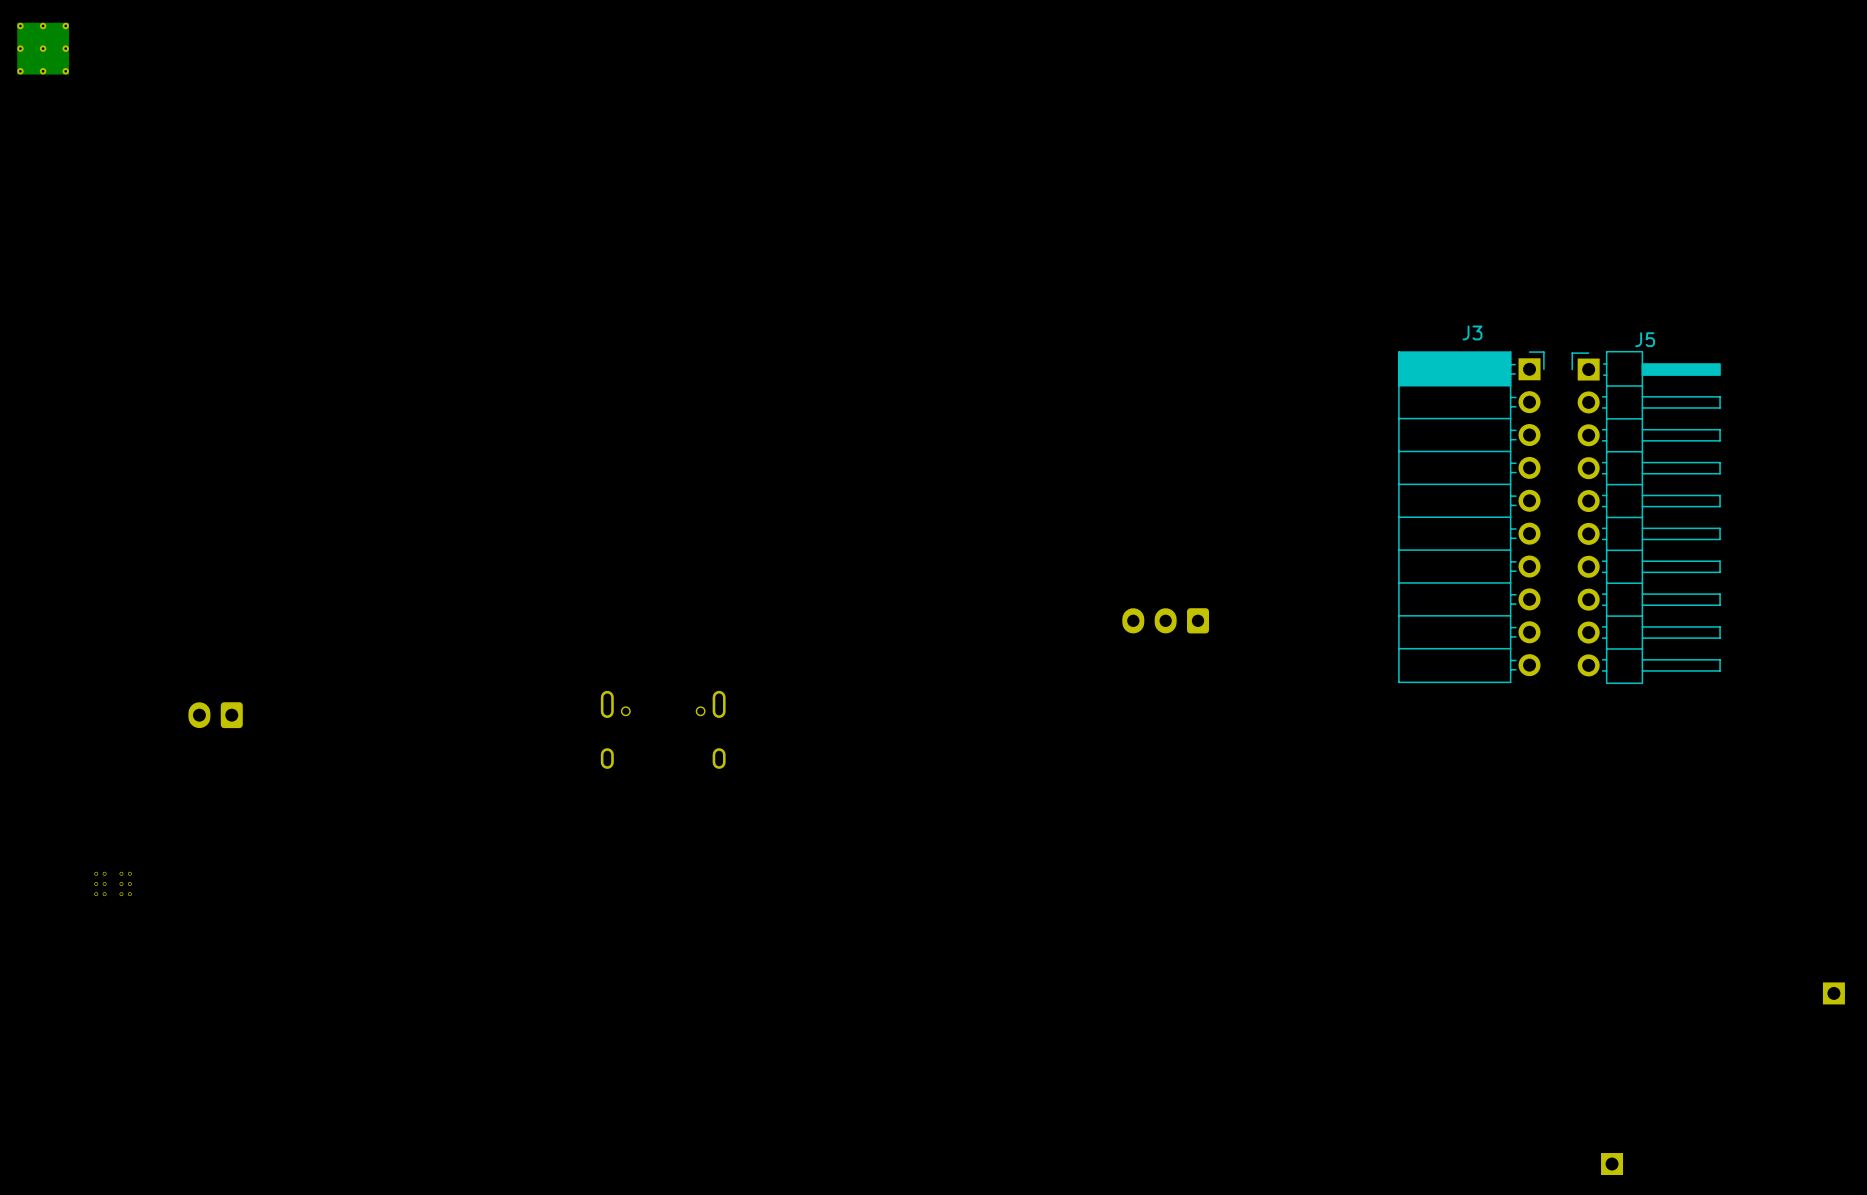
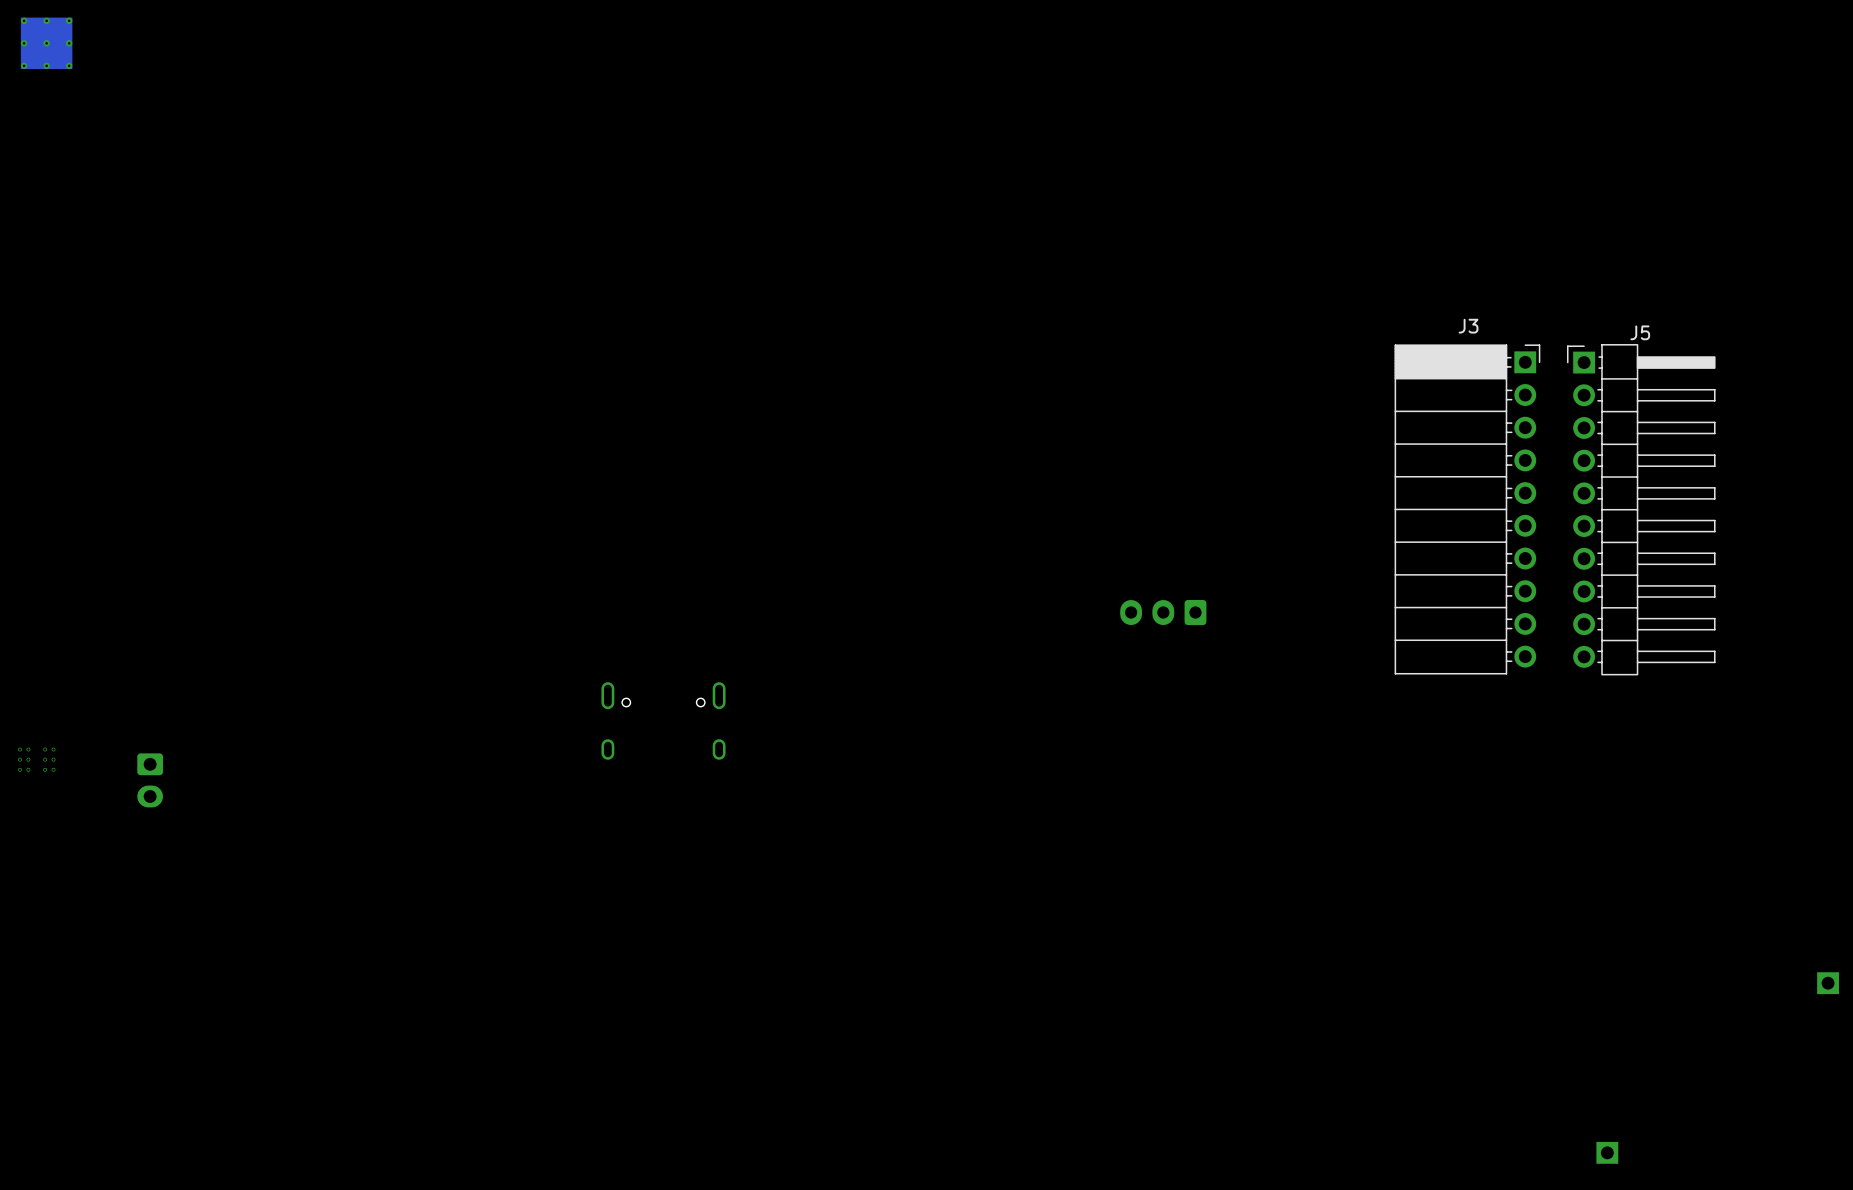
part rotation: 0° (215, 715) -> 90° counterclockwise (150, 780)
part position: (215, 715) -> (150, 780)
part position: (113, 883) -> (36, 759)

